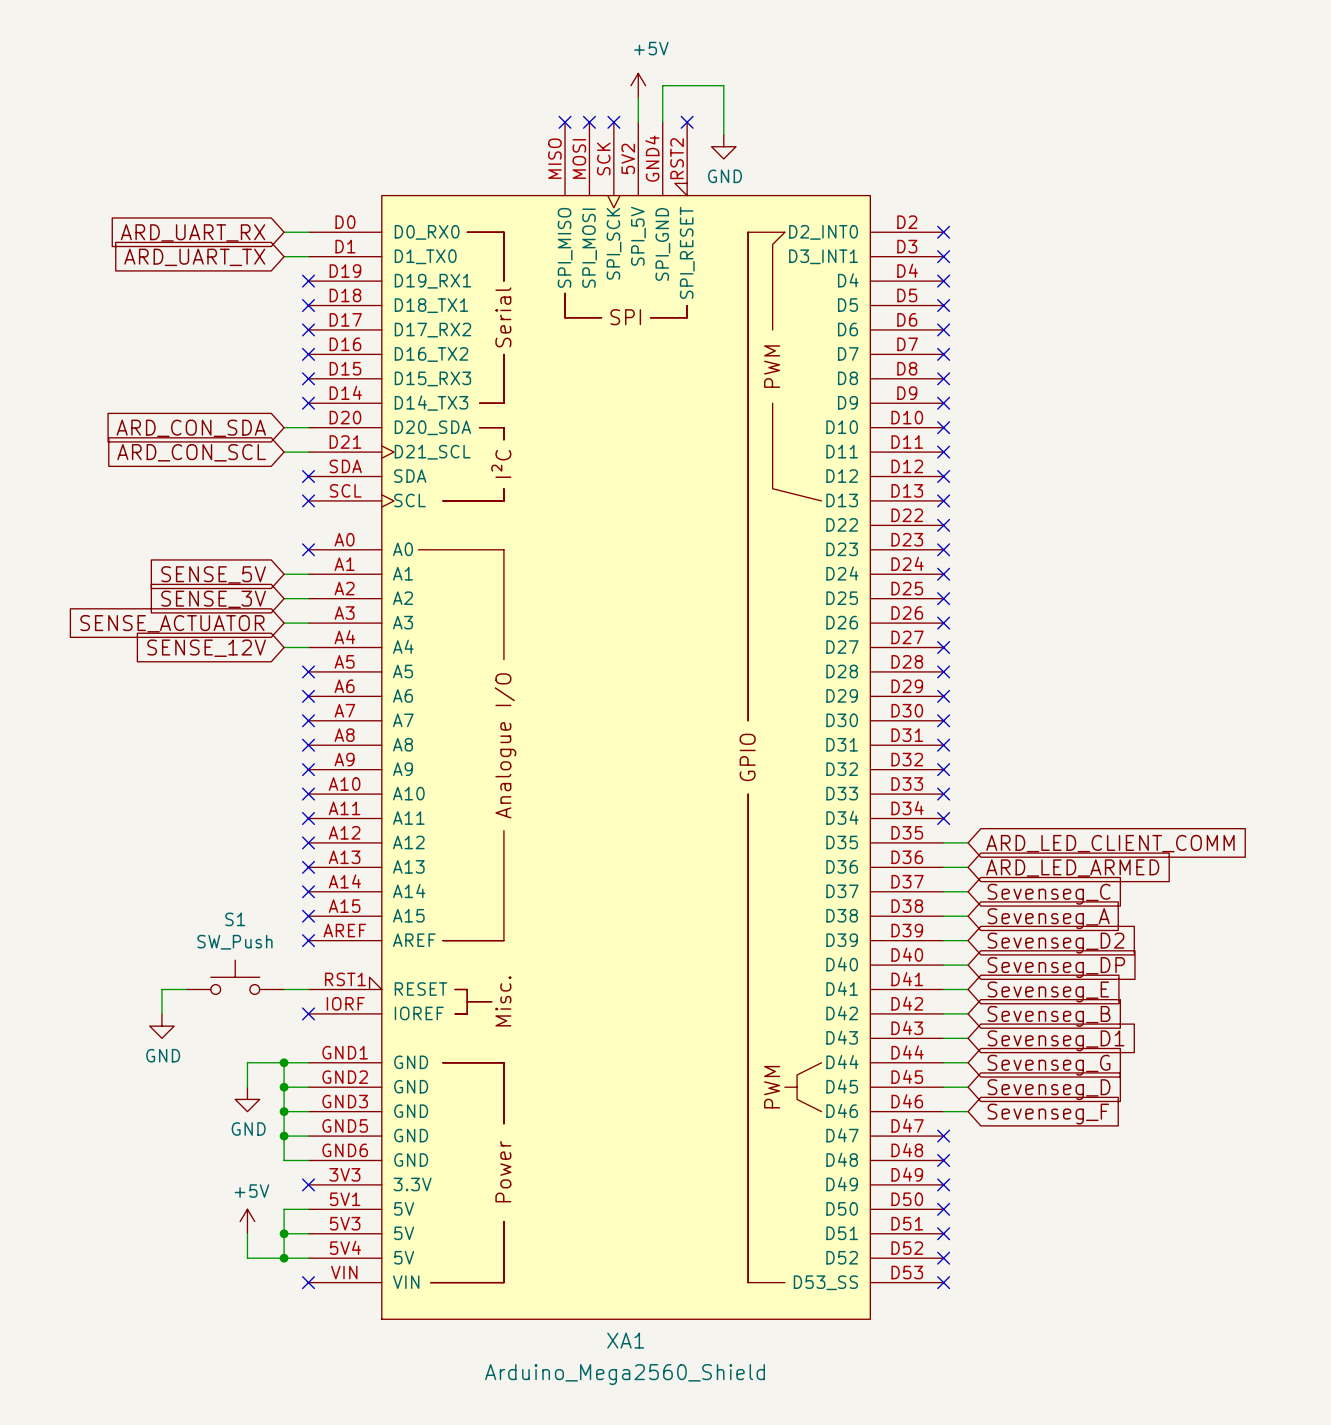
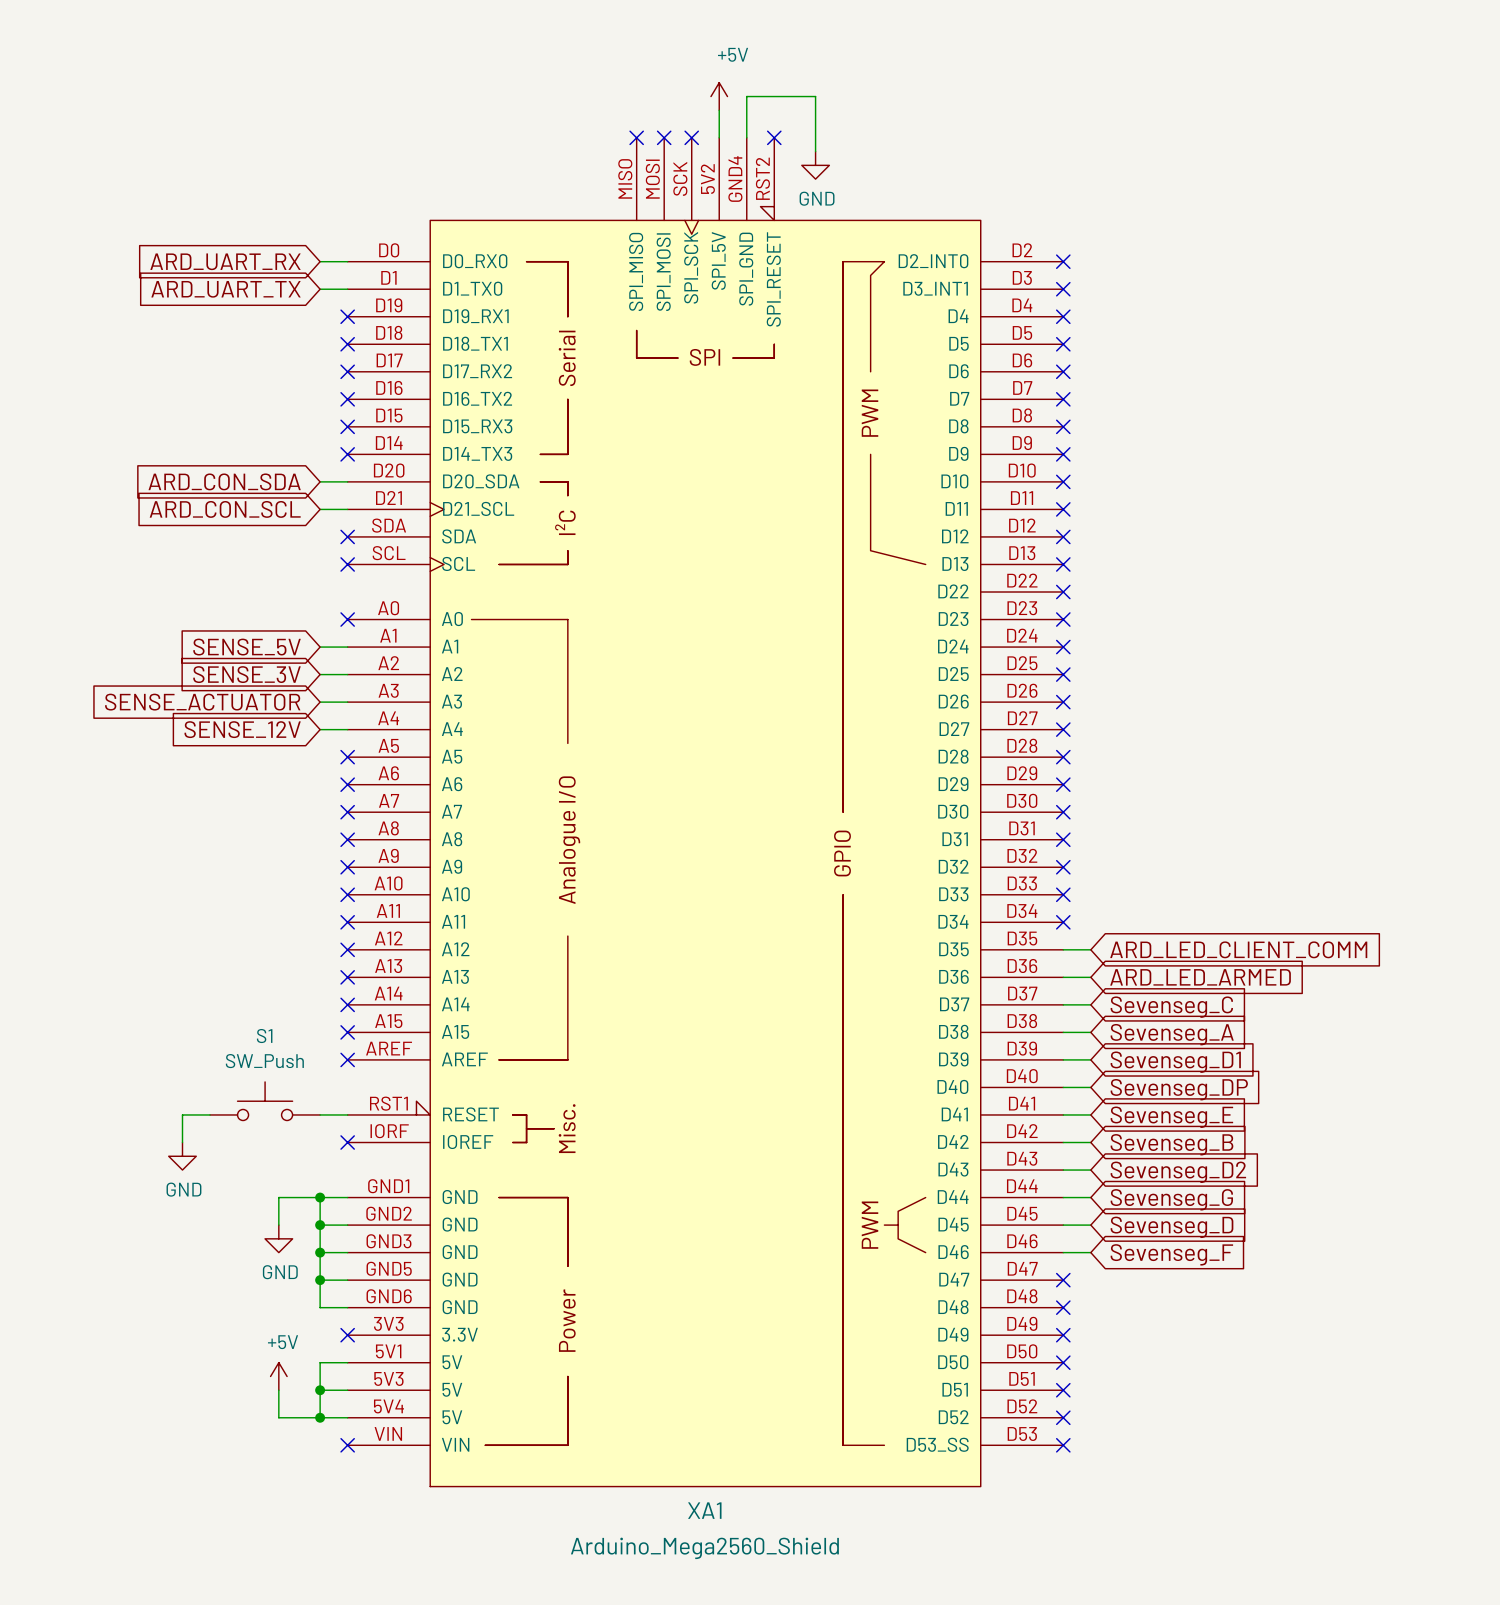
global label: Sevenseg_D2 (1056, 943) -> Sevenseg_D1 (1175, 1062)
global label: Sevenseg_D1 (1056, 1040) -> Sevenseg_D2 (1178, 1172)

